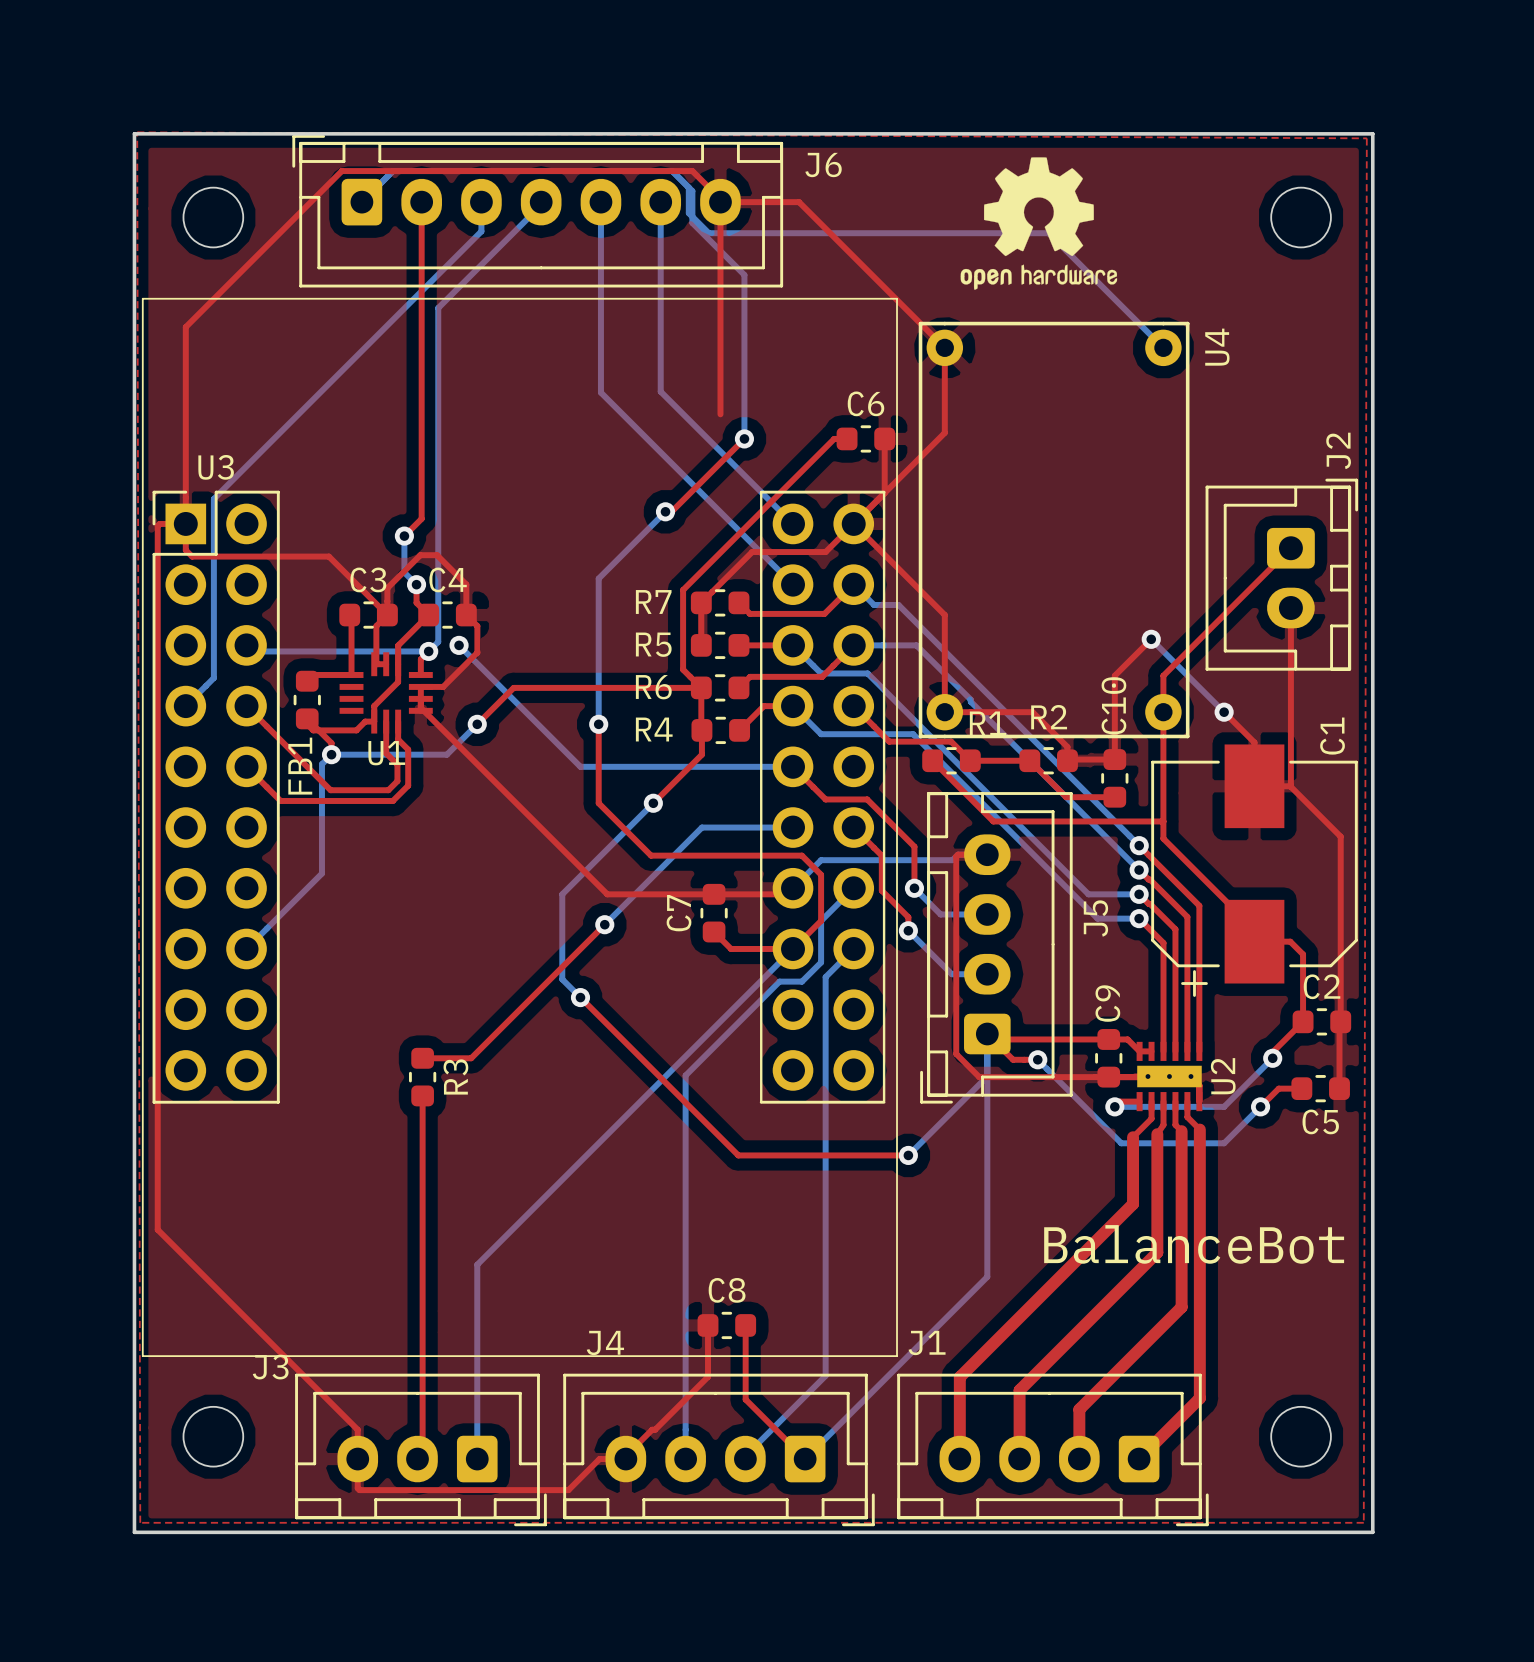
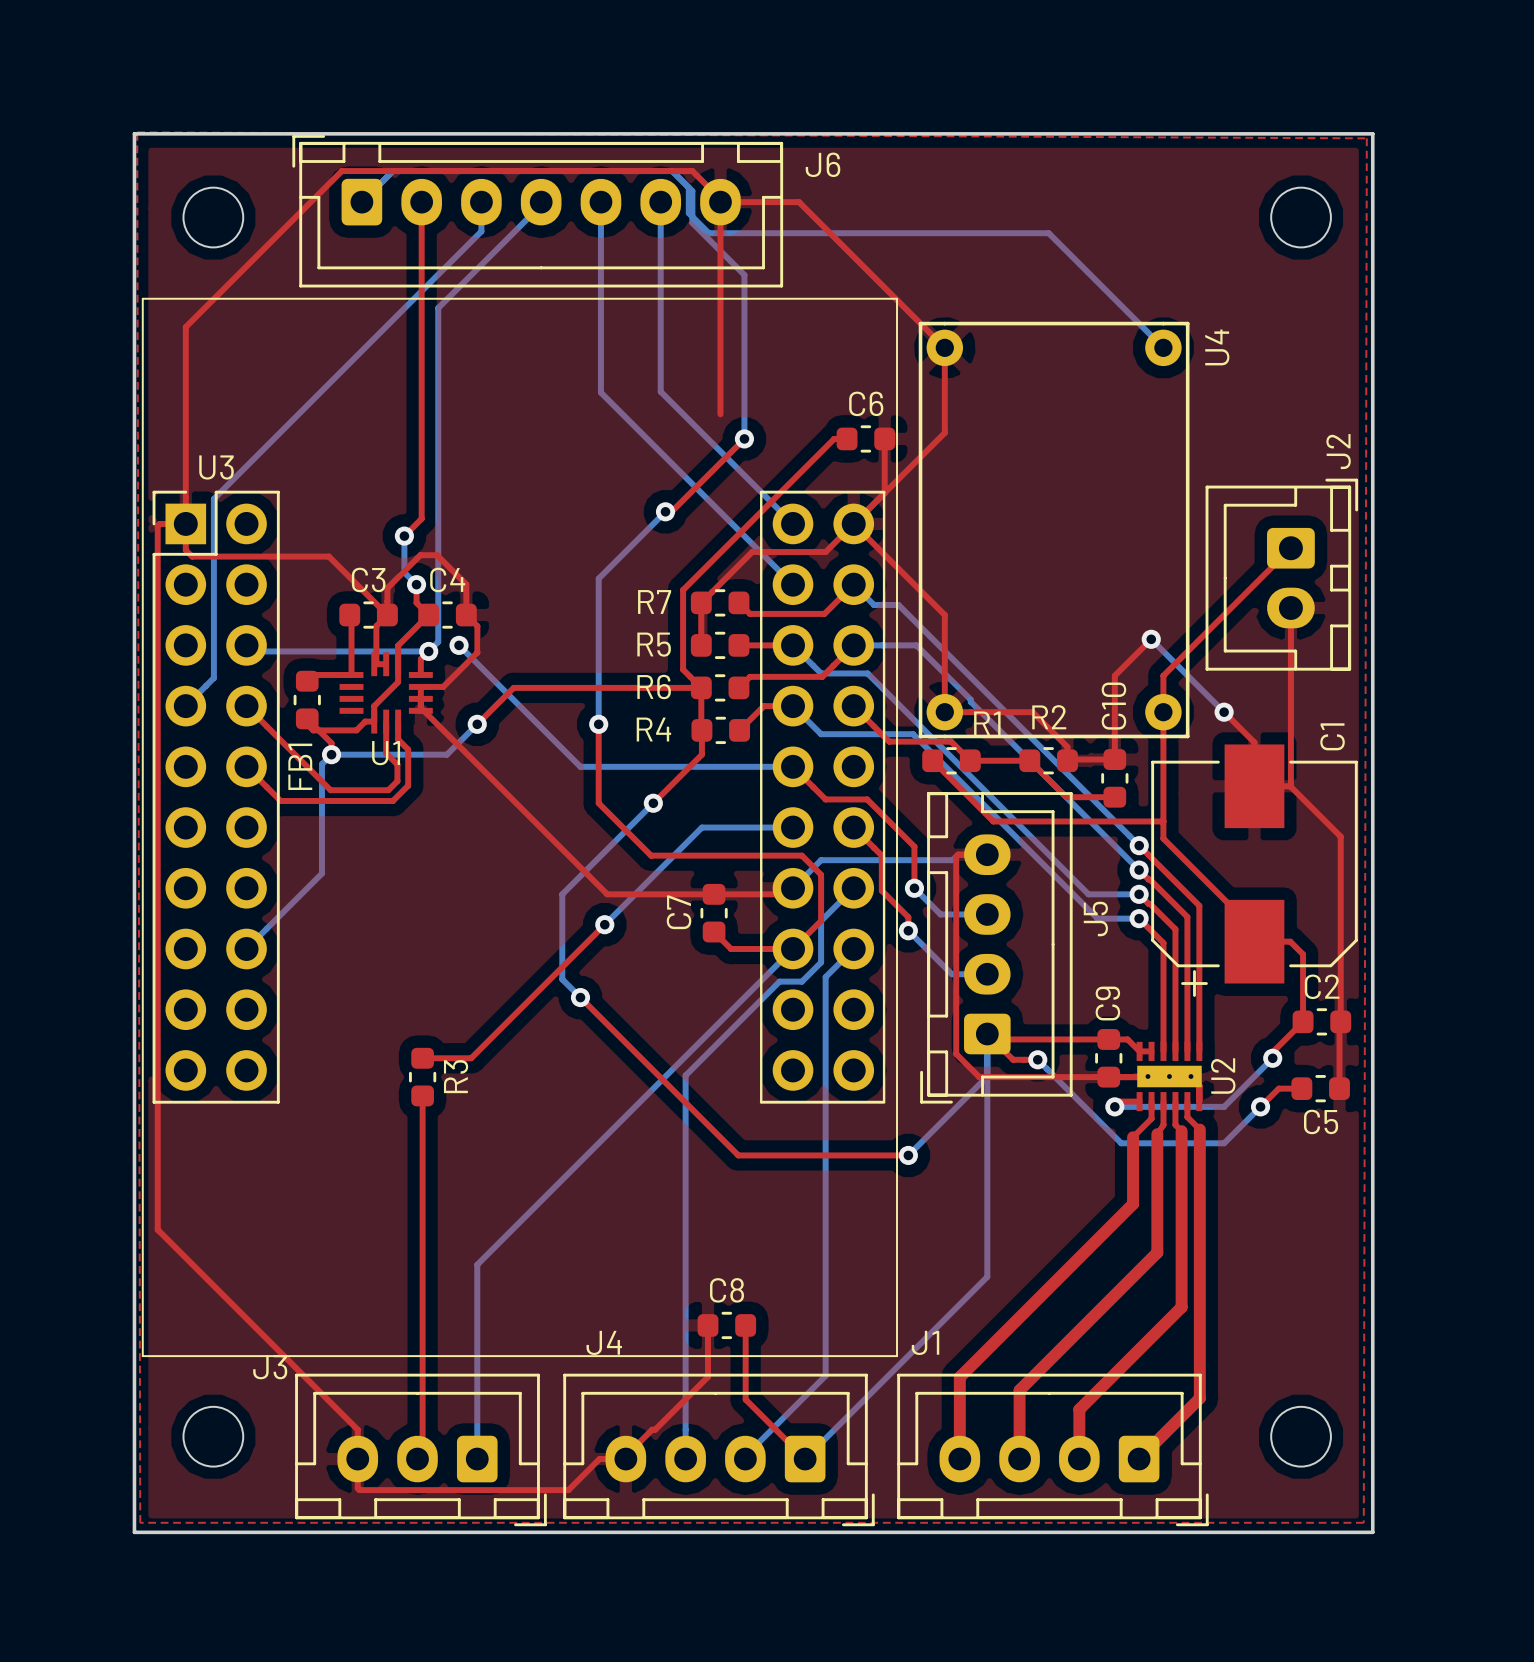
drawing: [960, 157, 1118, 290] -> none
text: BalanceBot (1194, 1244) -> none

